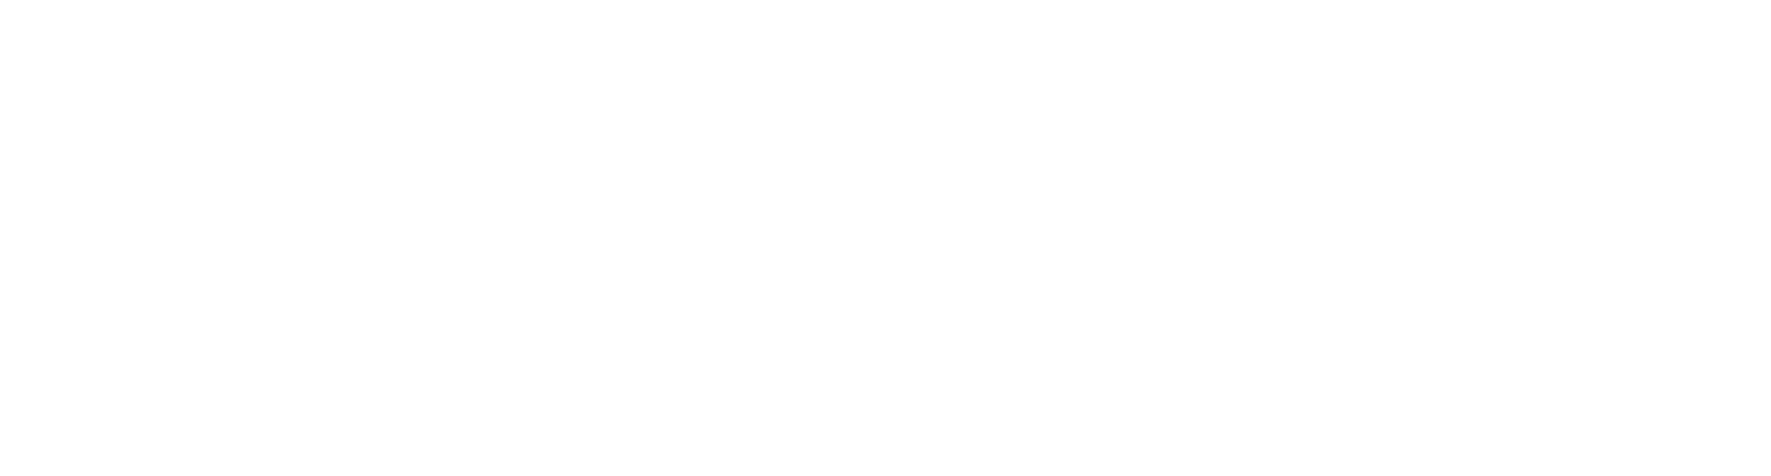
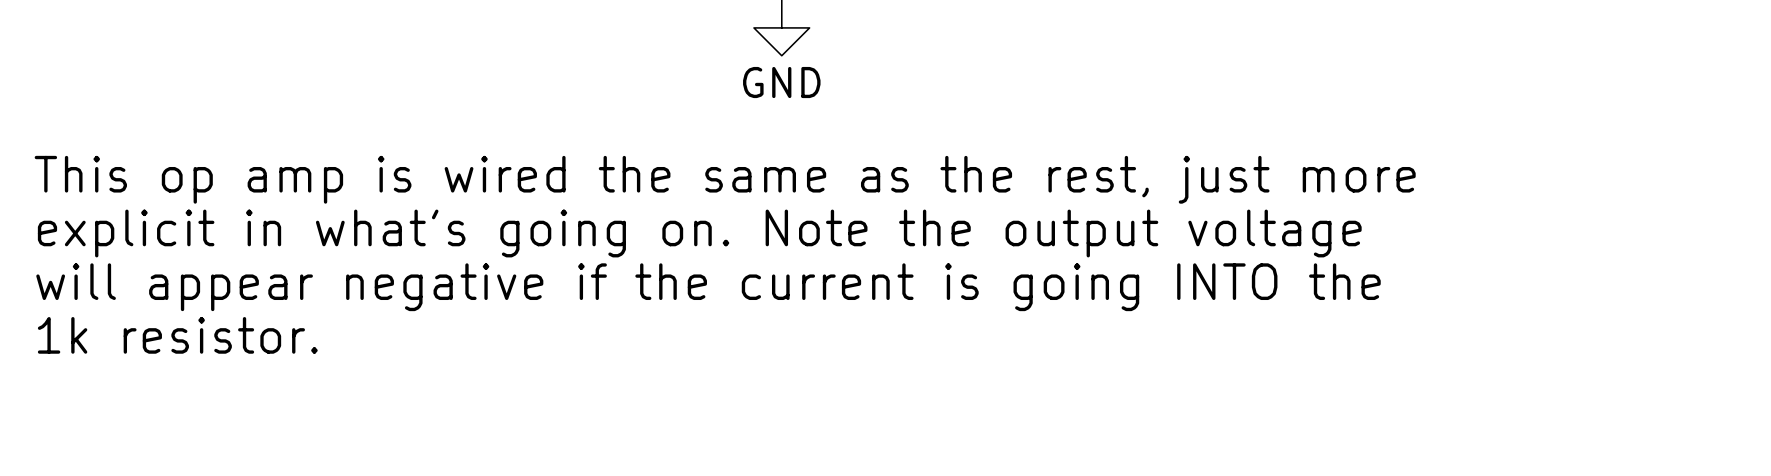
power symbol: none -> GND (781, 27)
text: none -> This op amp is wired the same as the rest, just more (725, 179)
text: none -> explicit in what's going on. Note the output voltage (699, 233)
text: none -> will appear negative if the current is going INTO the (708, 287)
text: none -> 1k resistor. (177, 335)

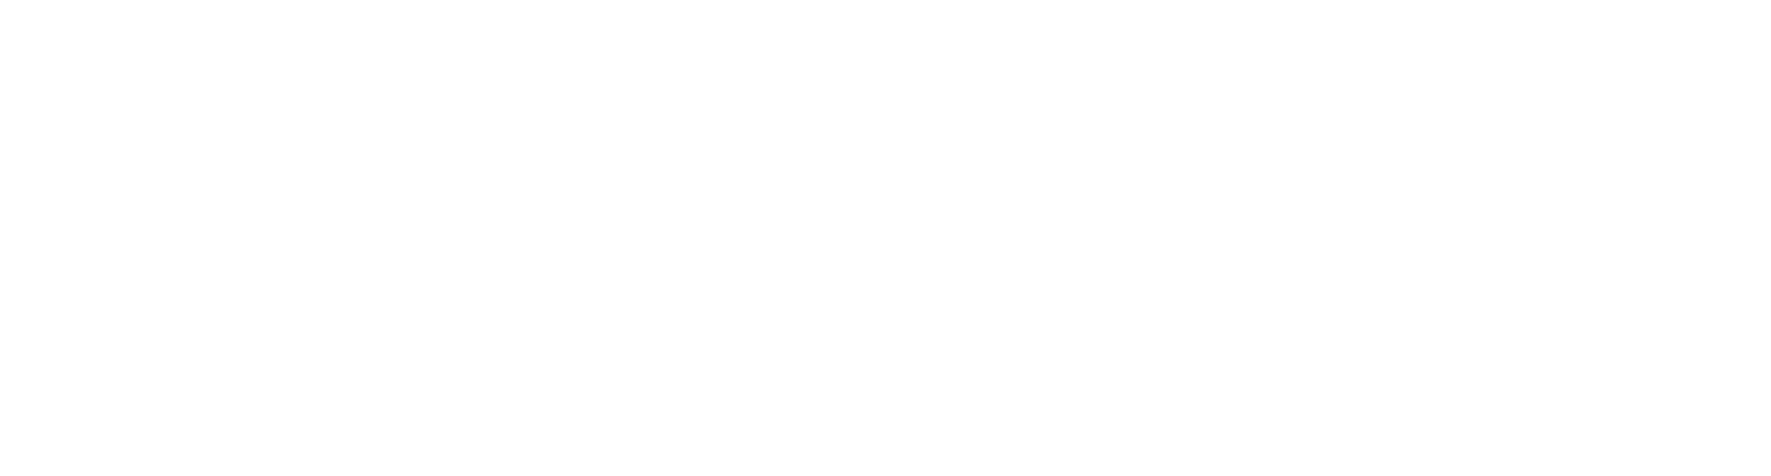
power symbol: GND (781, 27) -> none
text: This op amp is wired the same as the rest, just more (725, 179) -> none
text: explicit in what's going on. Note the output voltage (699, 233) -> none
text: will appear negative if the current is going INTO the (708, 287) -> none
text: 1k resistor. (177, 335) -> none

